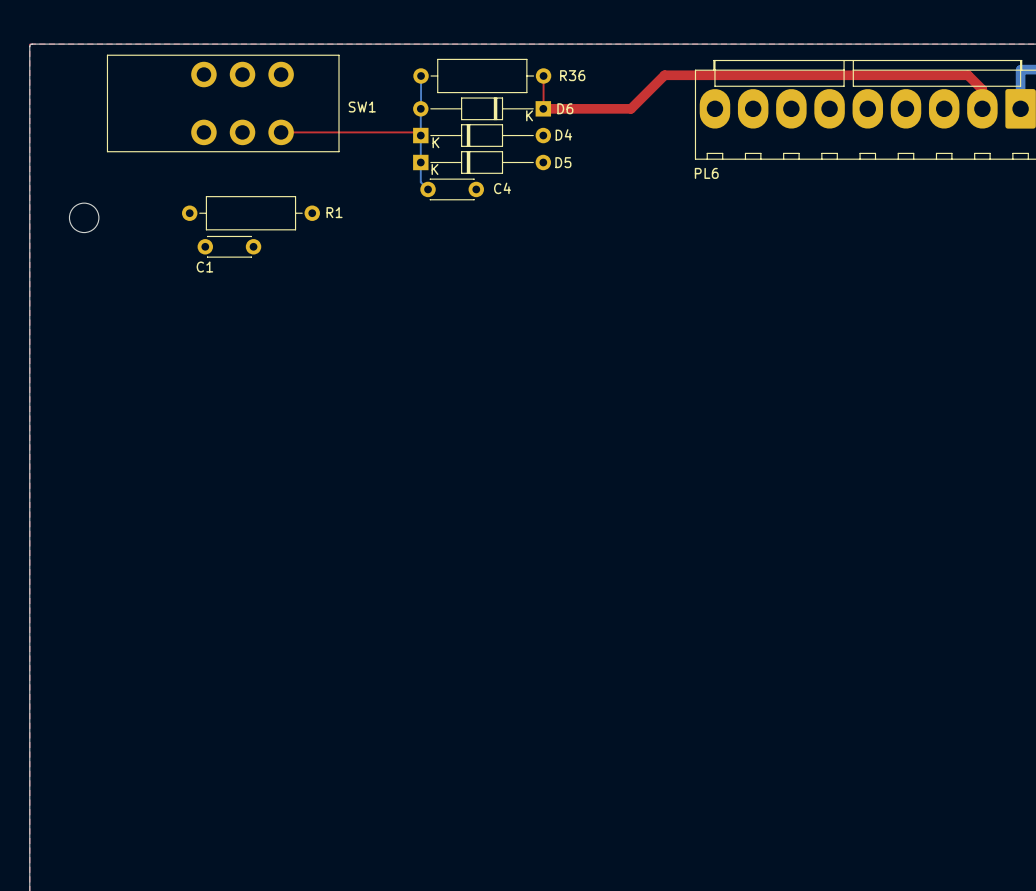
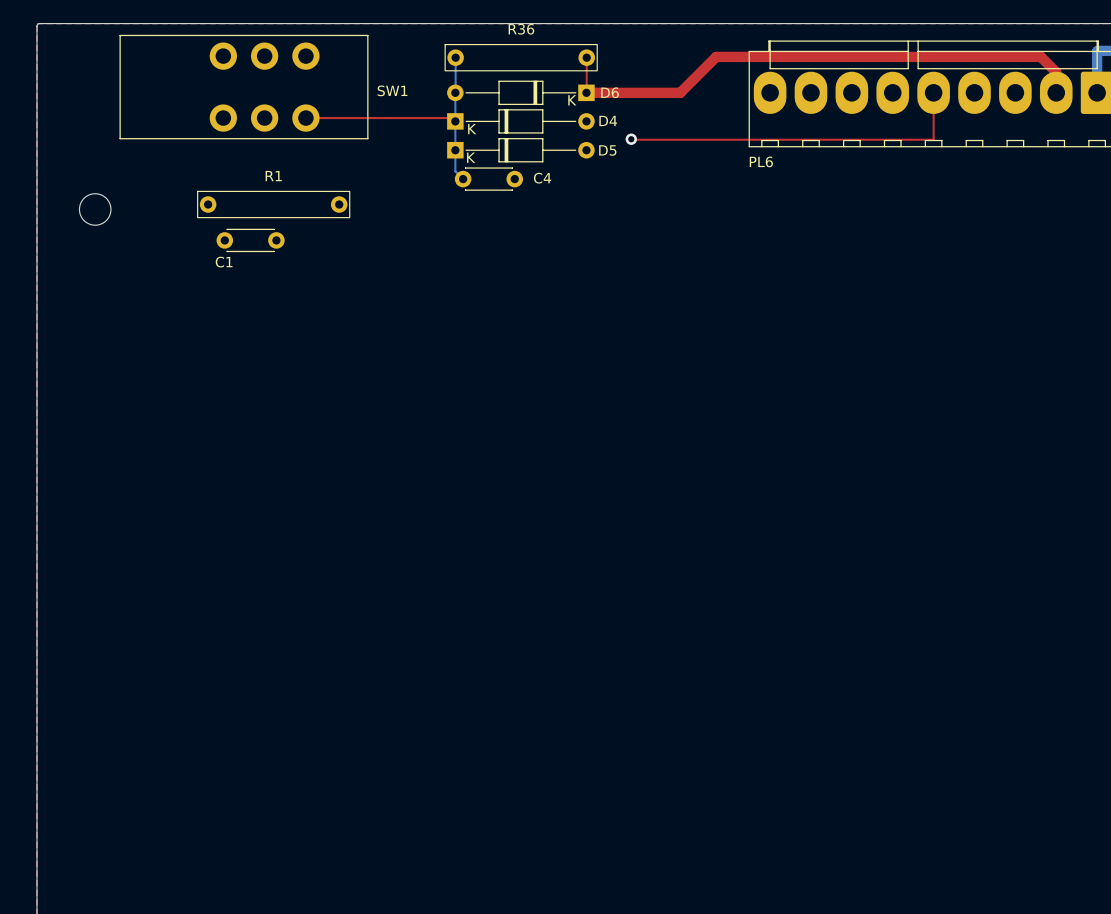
R36 footprint: [413, 58, 552, 94] -> [444, 44, 598, 72]
R36 name position: R36 (572, 75) -> R36 (521, 29)
top track: none -> (933, 92) (933, 139) (631, 139)
via: none -> (631, 139)
R1 footprint: [182, 196, 320, 231] -> [197, 190, 351, 219]
R1 name position: R1 (334, 212) -> R1 (273, 176)

